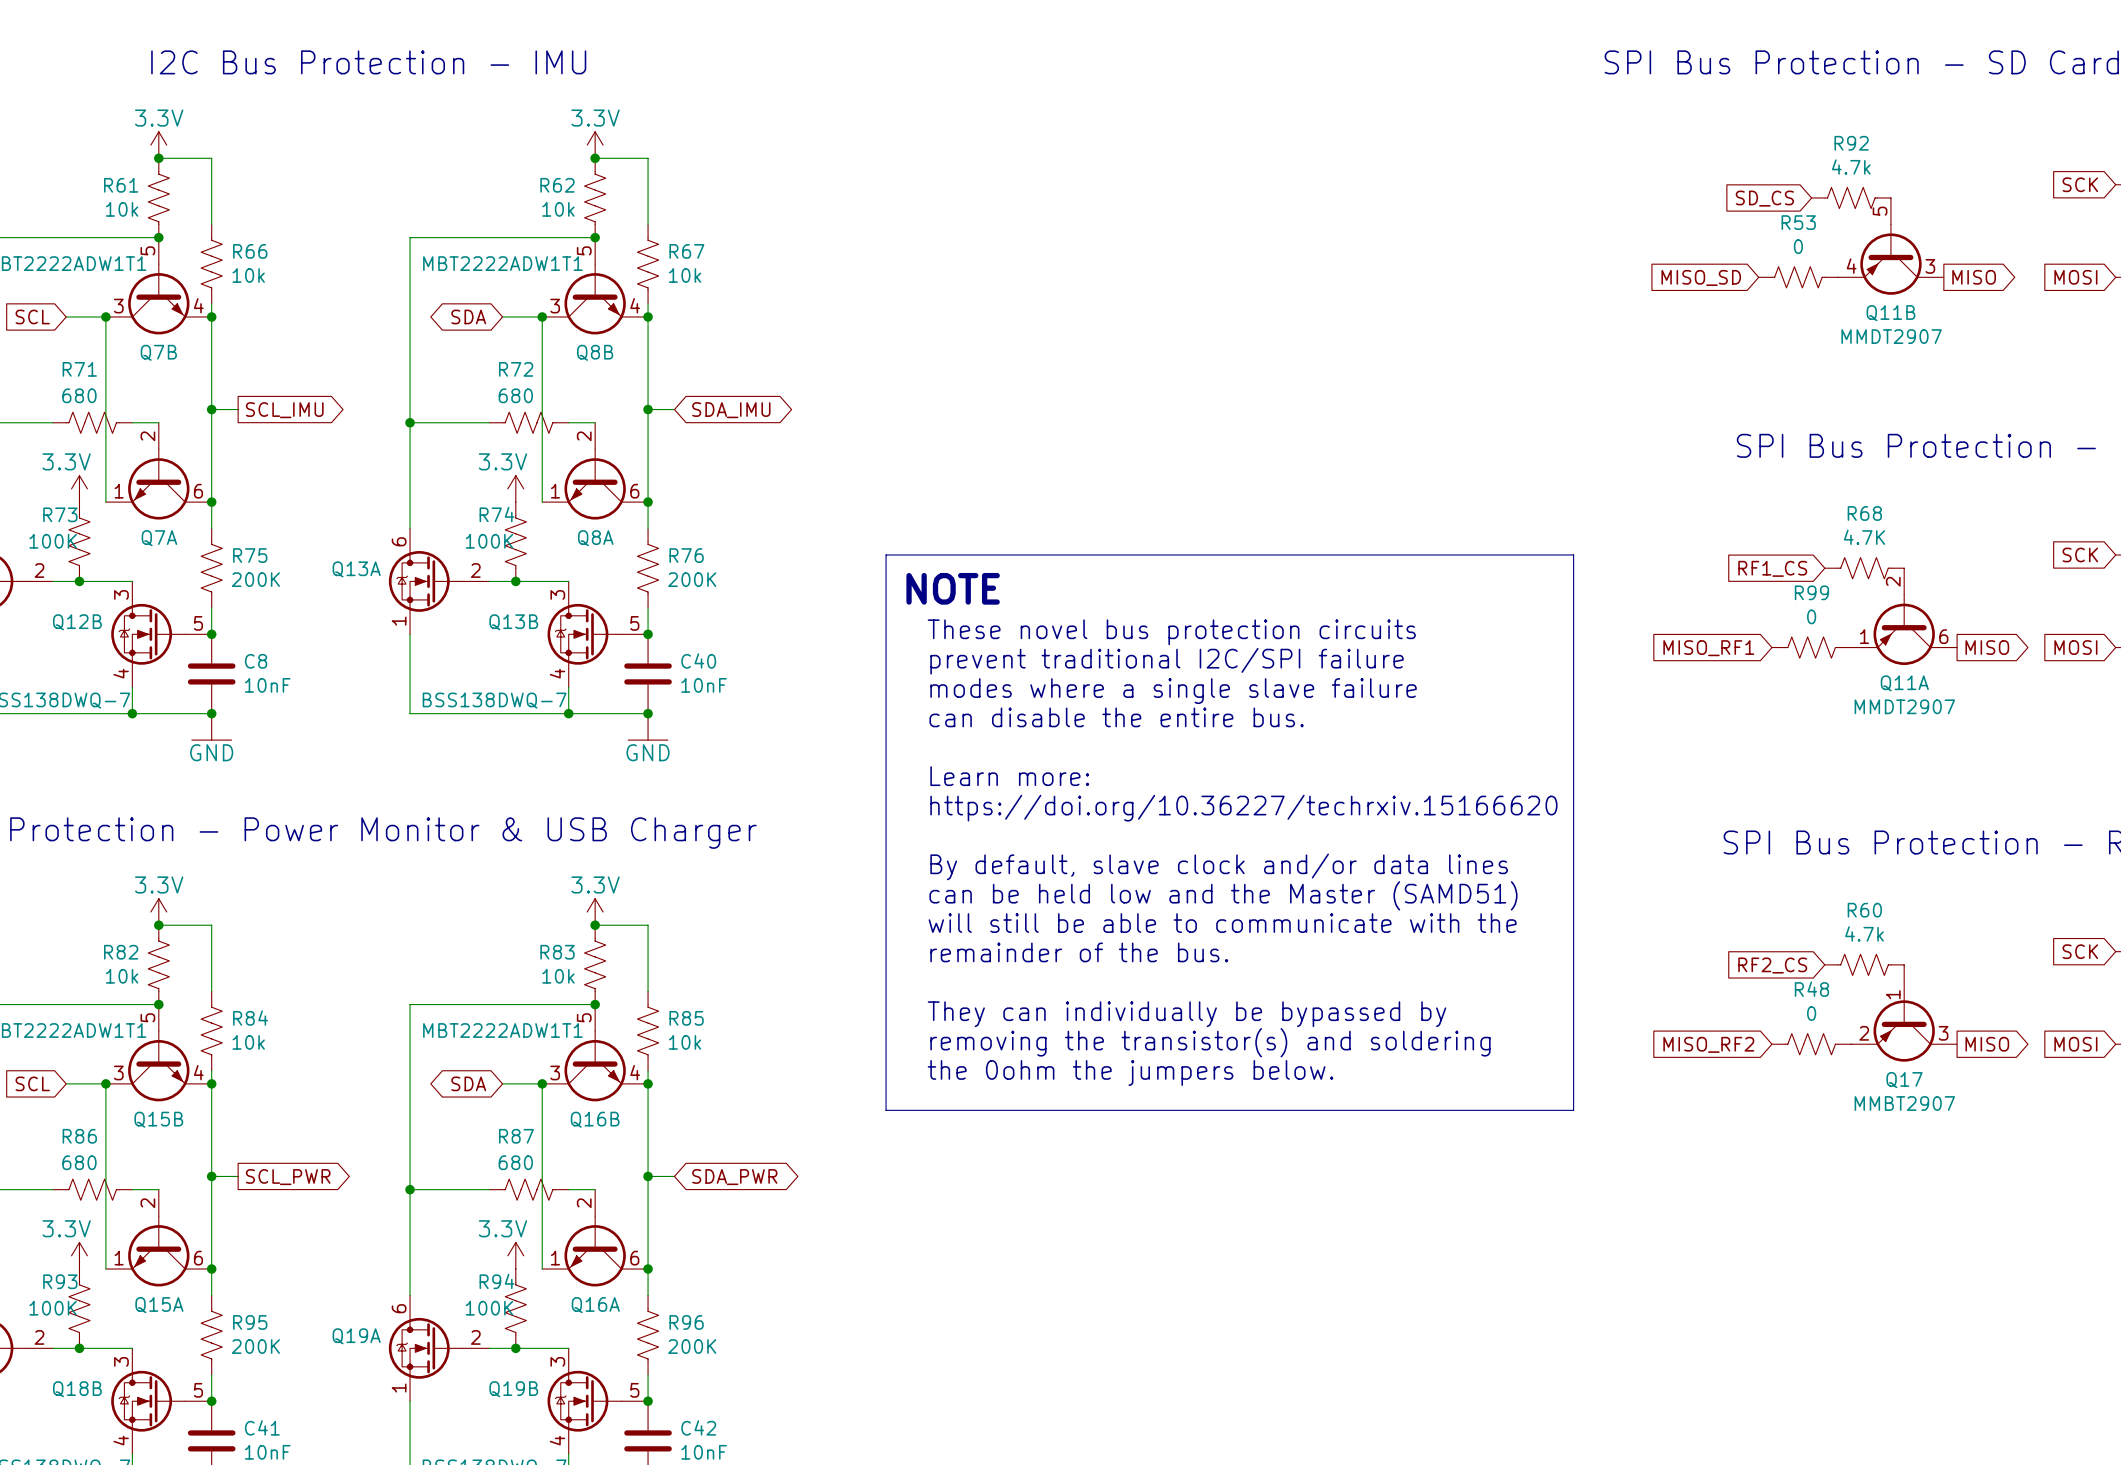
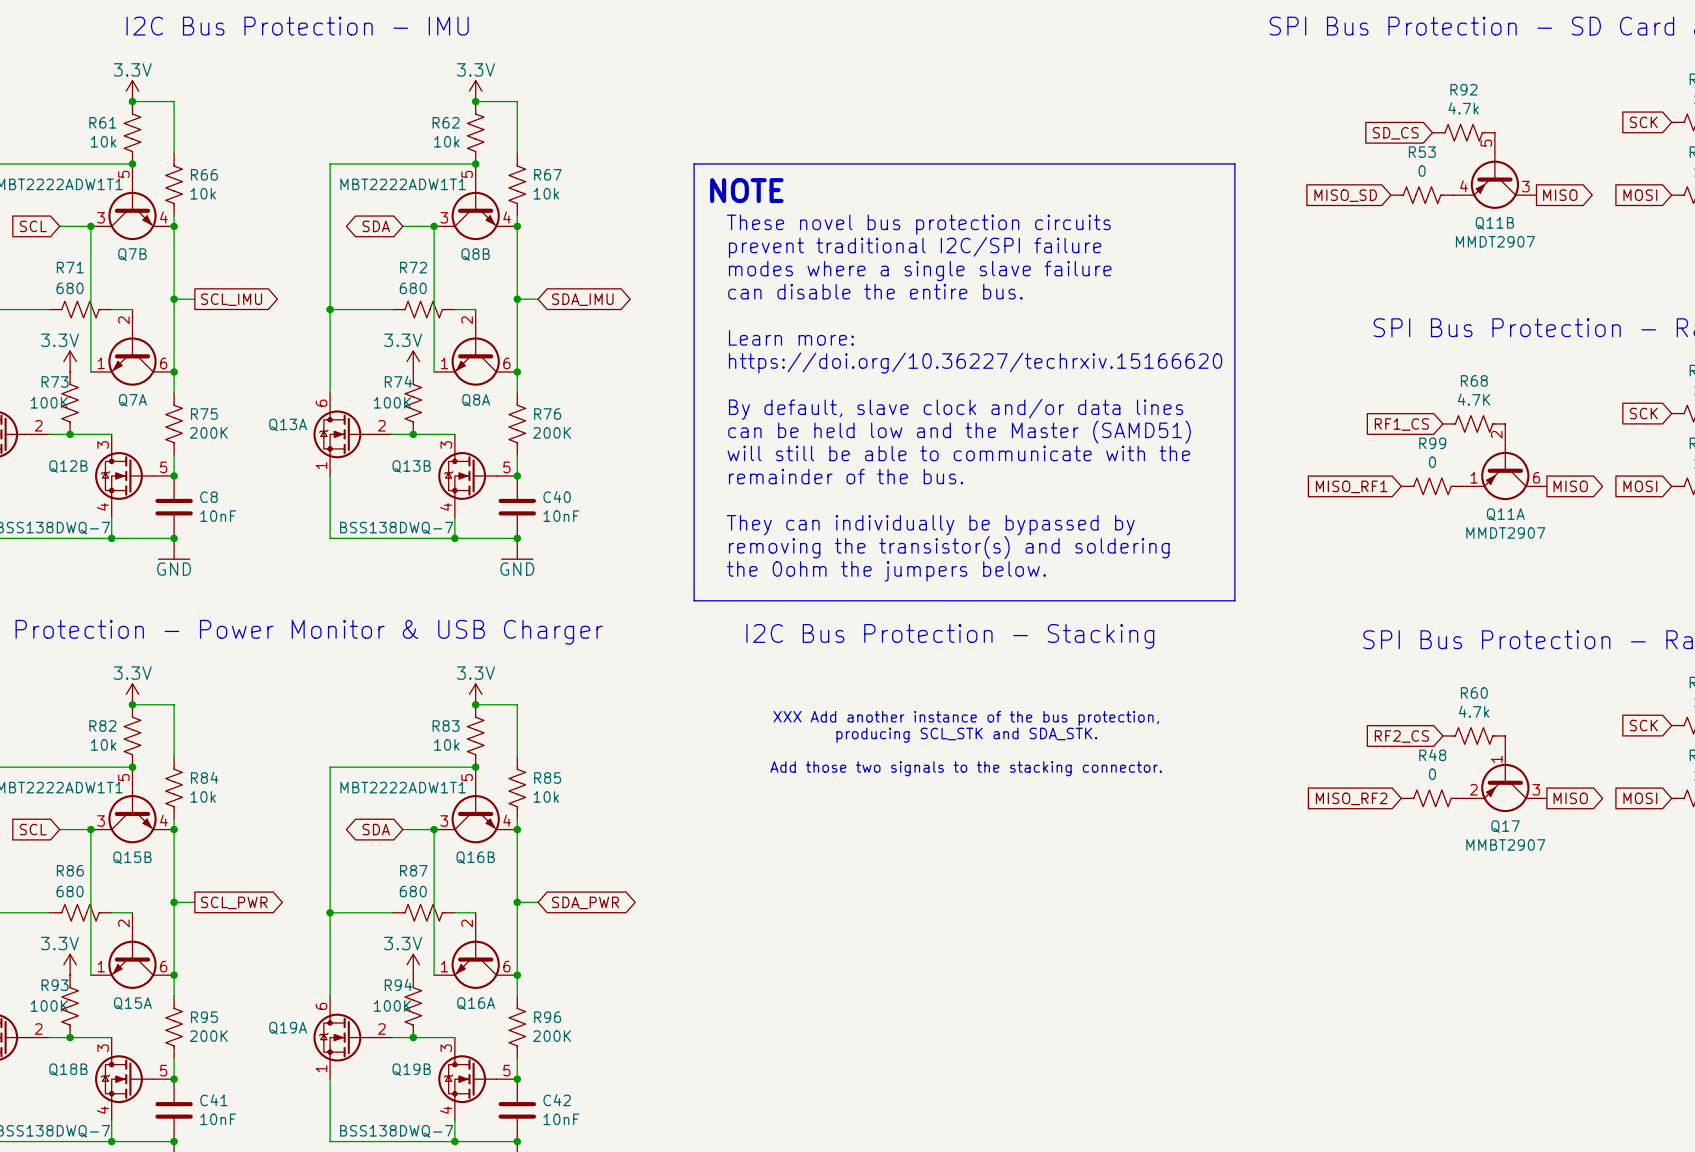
line: none -> (694, 163) (1234, 163) (1234, 600) (694, 600) (694, 163)
text: none -> NOTE (746, 190)
text: none -> These novel bus protection circuits (918, 224)
text: none -> prevent traditional I2C/SPI failure (915, 247)
text: none -> modes where a single slave failure (920, 270)
text: none -> can disable the entire bus. (875, 291)
text: none -> Learn more: (791, 337)
text: none -> https://doi.org/10.36227/techrxiv.15166620 (975, 363)
text: none -> By default, slave clock and/or data lines (956, 409)
line: (886, 554) (1573, 554) (1573, 1110) (886, 1110) (886, 554) -> none
text: none -> can be held low and the Master (SAMD51) (959, 432)
text: NOTE (953, 588) -> none
text: none -> will still be able to communicate with the (958, 453)
text: These novel bus protection circuits (1171, 632) -> none
text: none -> remainder of the bus. (846, 476)
text: prevent traditional I2C/SPI failure (1167, 661) -> none
text: modes where a single slave failure (1173, 691) -> none
text: none -> They can individually be bypassed by (930, 525)
text: can disable the entire bus. (1116, 717) -> none
text: none -> removing the transistor(s) and soldering (949, 547)
text: none -> the 0ohm the jumpers below. (886, 571)
text: Learn more: (1009, 776) -> none
text: https://doi.org/10.36227/techrxiv.15166620 (1243, 808) -> none
text: none -> I2C Bus Protection - Stacking (950, 636)
text: By default, slave clock and/or data lines (1219, 866) -> none
text: can be held low and the Master (SAMD51) (1223, 895) -> none
text: will still be able to communicate with the (1222, 923) -> none
text: none -> XXX Add another instance of the bus protection, (966, 718)
text: remainder of the bus. (1079, 952) -> none
text: none -> producing SCL_STK and SDA_STK. (966, 735)
text: none -> Add those two signals to the stacking connector. (966, 768)
text: They can individually be bypassed by (1186, 1014) -> none
text: removing the transistor(s) and soldering (1210, 1042) -> none
text: the 0ohm the jumpers below. (1130, 1072) -> none

